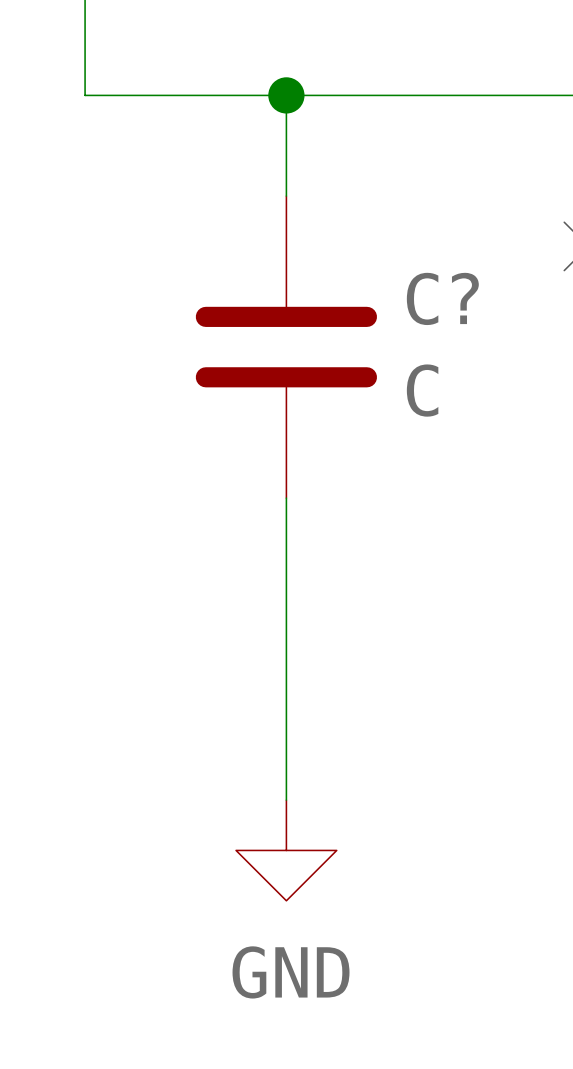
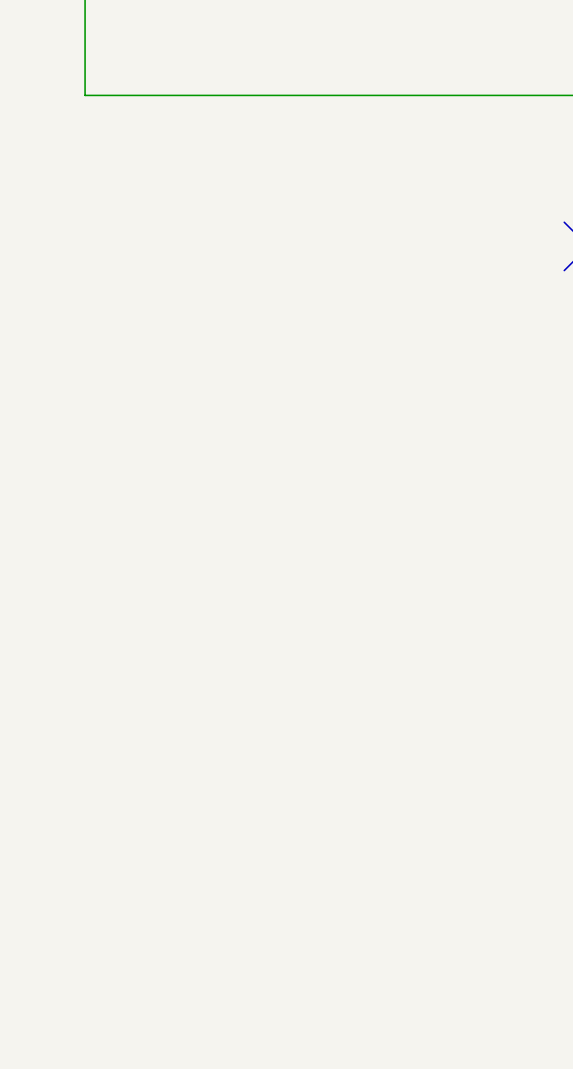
wire: (286, 95) (286, 196) -> none
junction: (286, 95) -> none
C?: C (286, 347) -> none
wire: (286, 498) (286, 800) -> none
power symbol: GND (286, 850) -> none

